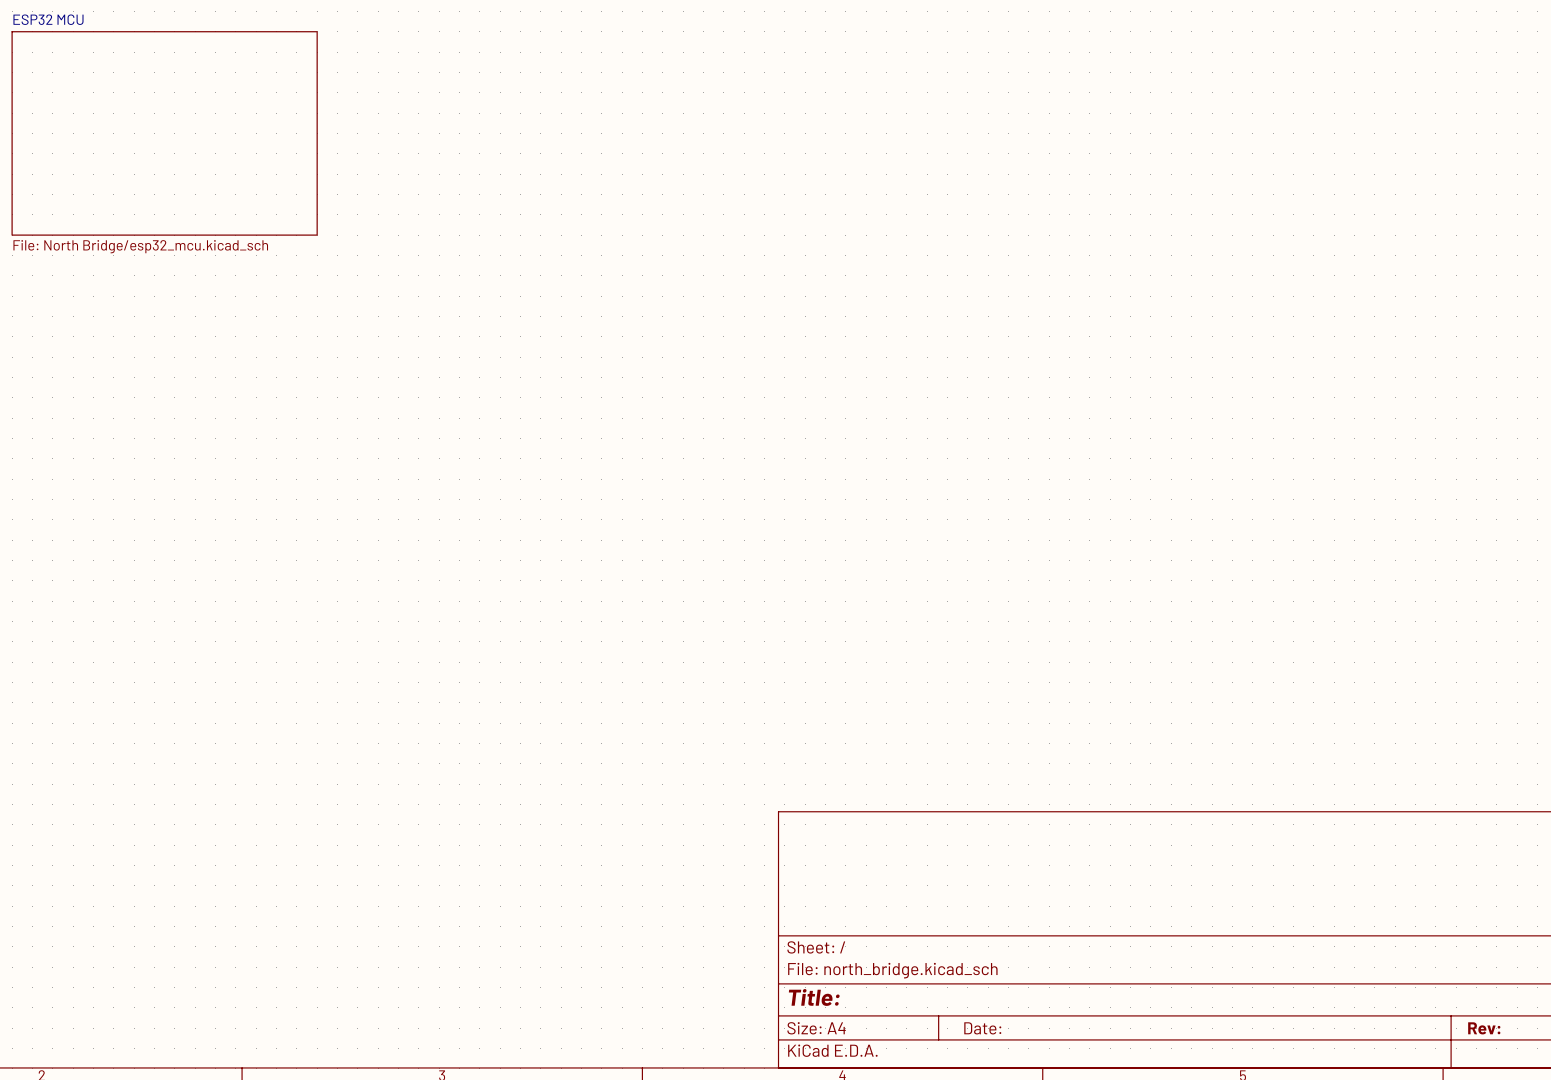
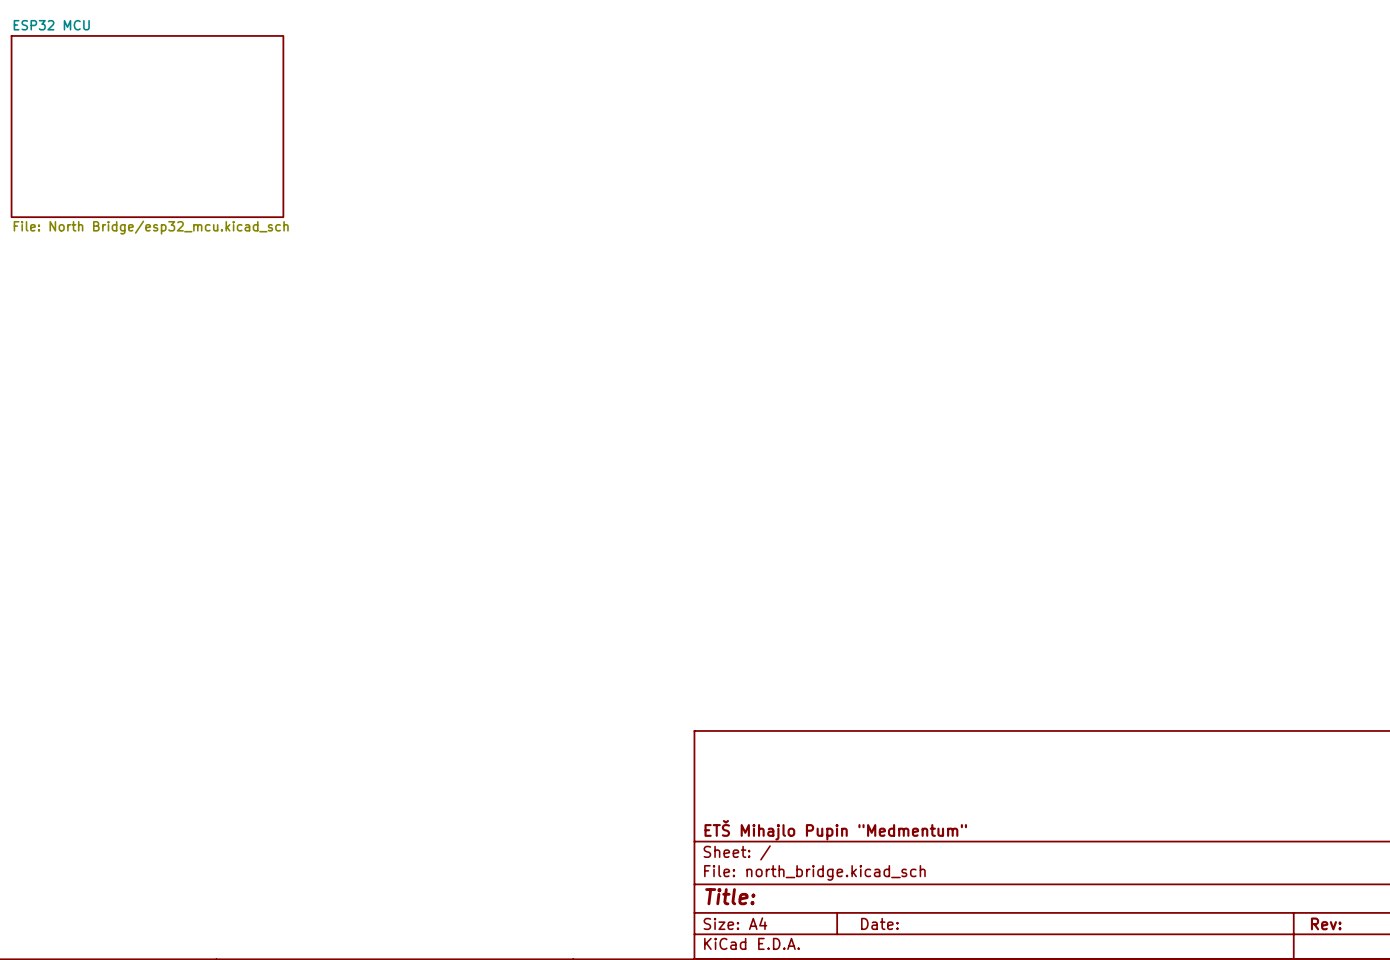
title block: none -> ETŠ Mihajlo Pupin "Medmentum" (835, 830)

